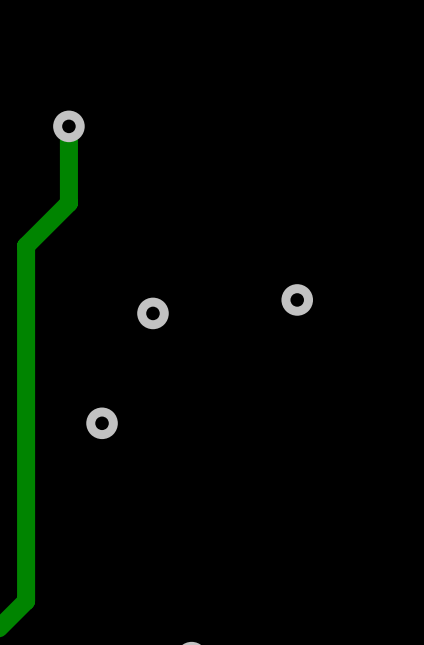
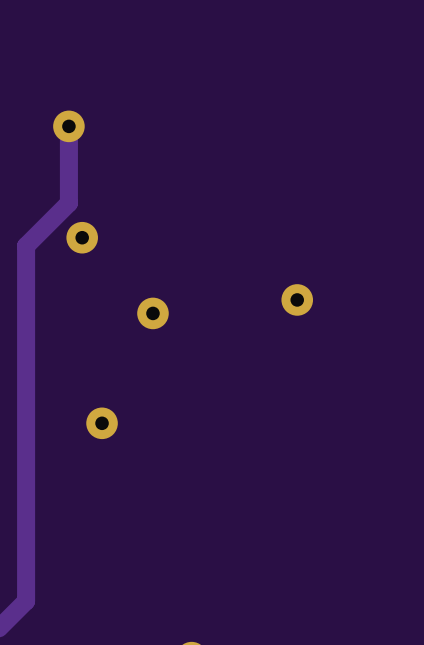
via: none -> (82, 237)

